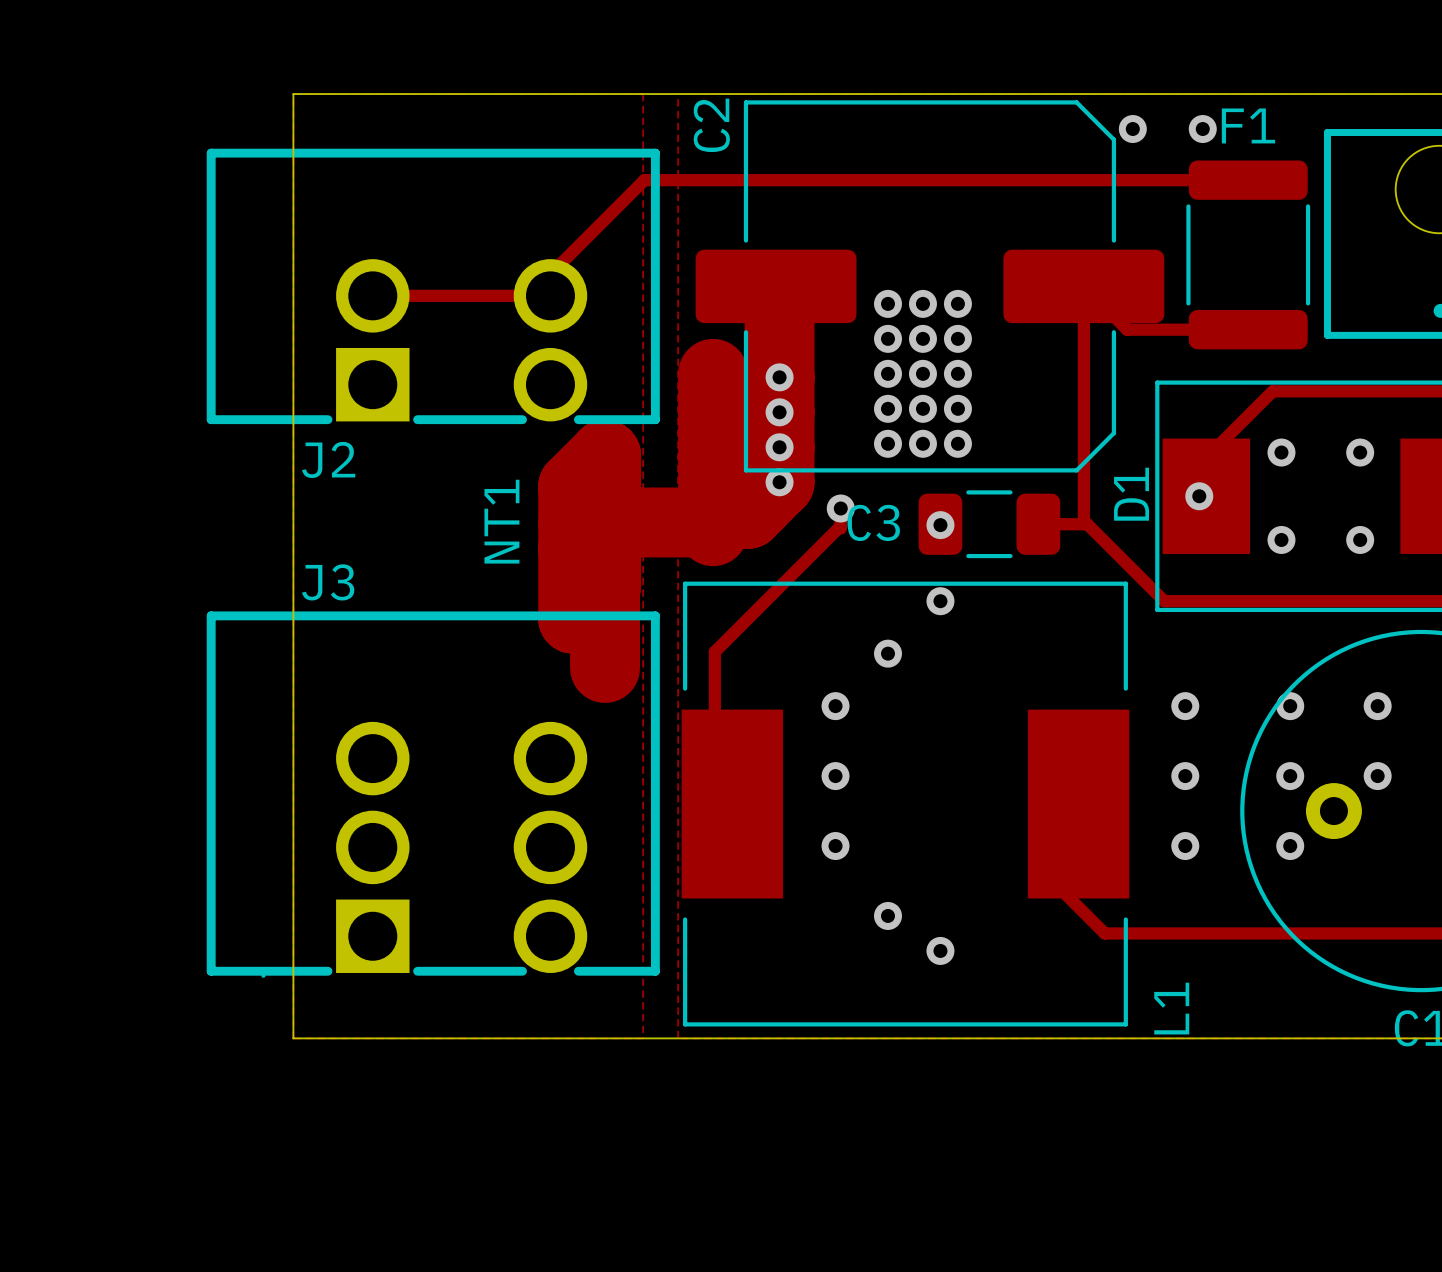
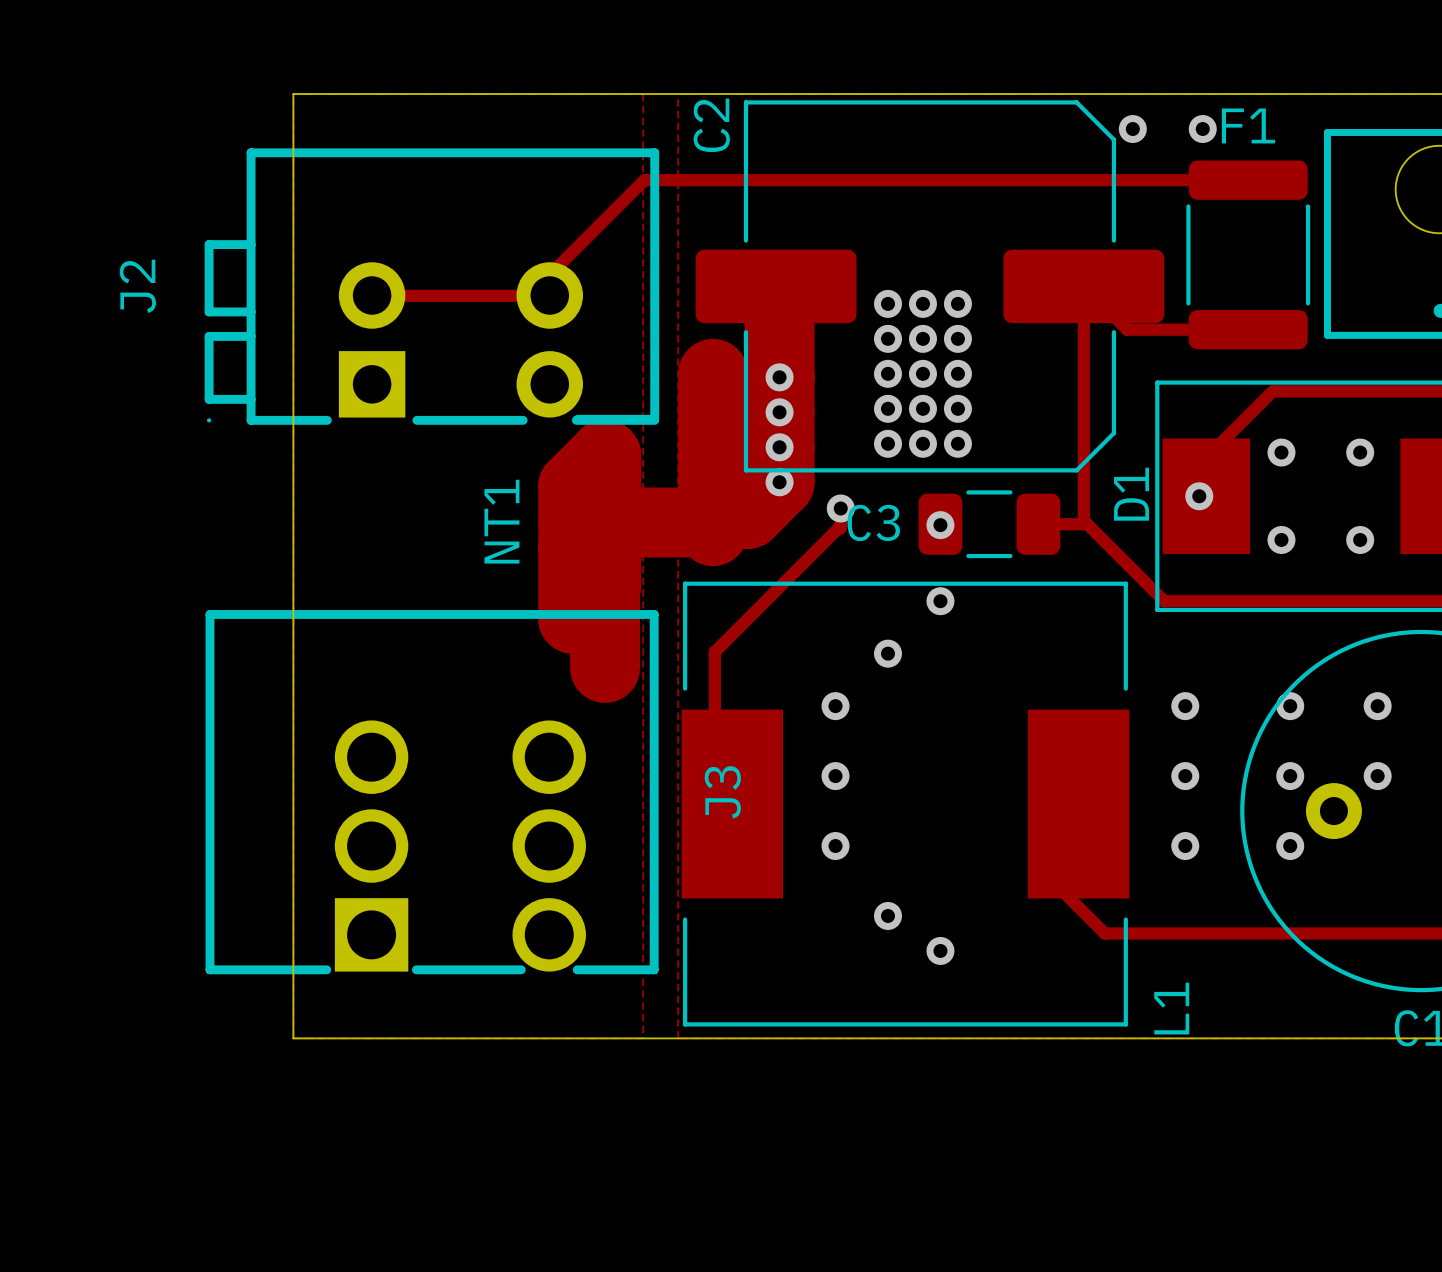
J2 footprint: [206, 148, 660, 425] -> [204, 148, 660, 425]
J2 name position: J2 (328, 459) -> J2 (137, 286)
J3 name rotation: 0° (328, 582) -> 90° counterclockwise (722, 792)
J3 name position: J3 (328, 582) -> J3 (722, 792)
J3 footprint: [206, 611, 660, 978] -> [205, 610, 659, 975]

